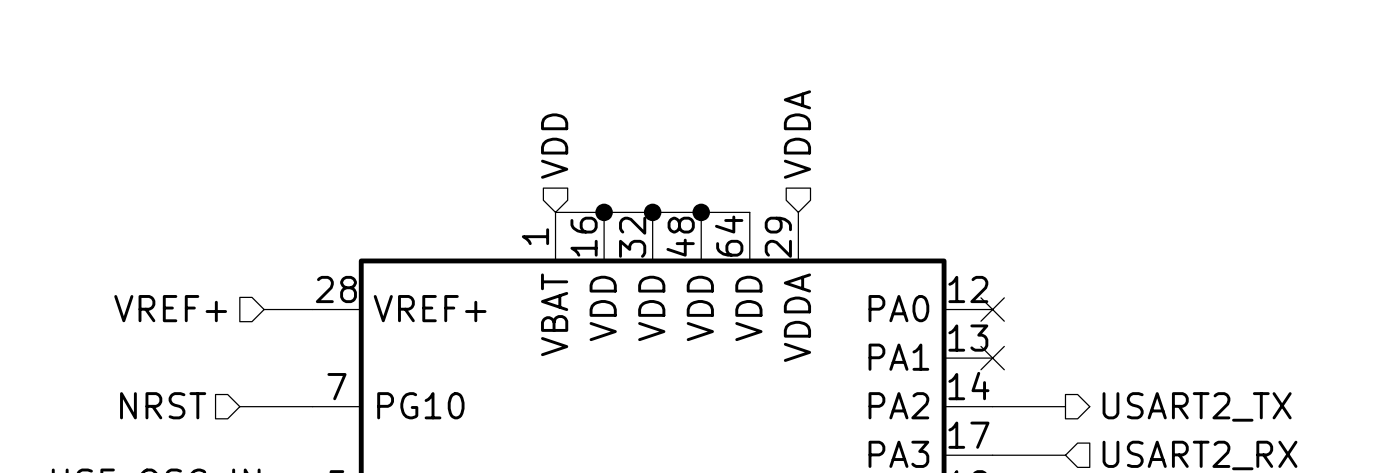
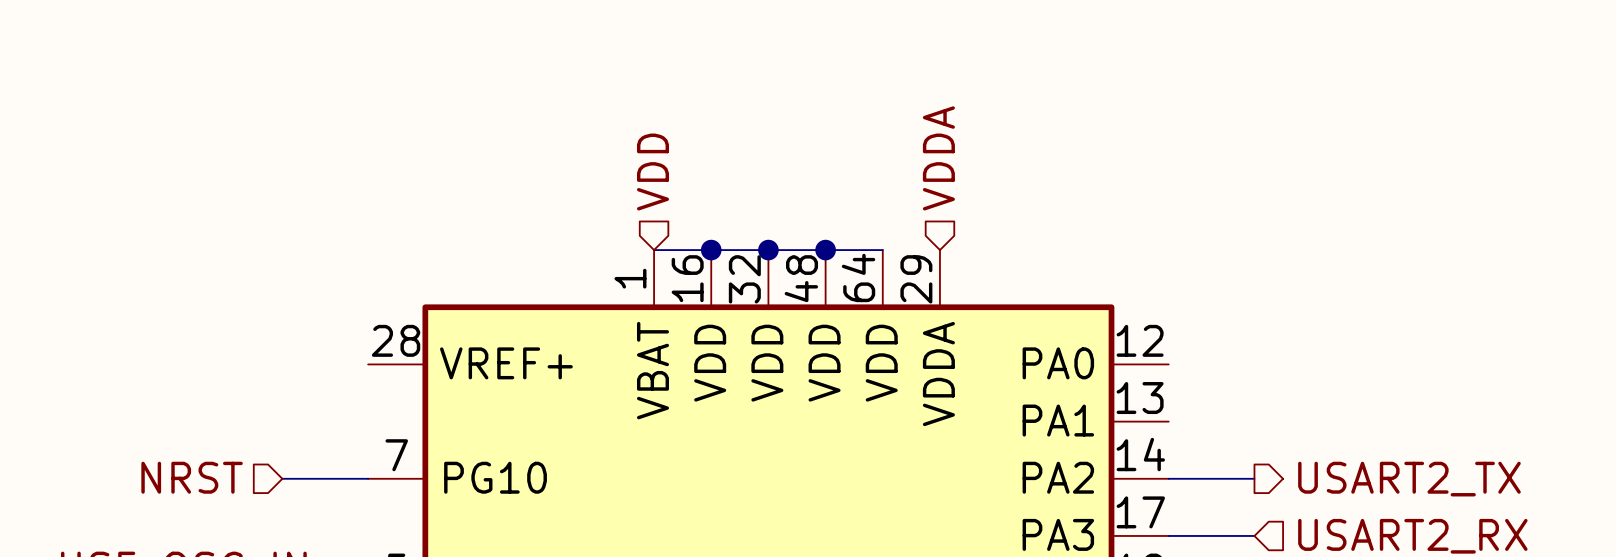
hierarchical label: VREF+ (170, 308) -> none
wire: (264, 309) (312, 309) -> none
no-connect mark: (992, 309) -> none
no-connect mark: (992, 358) -> none

